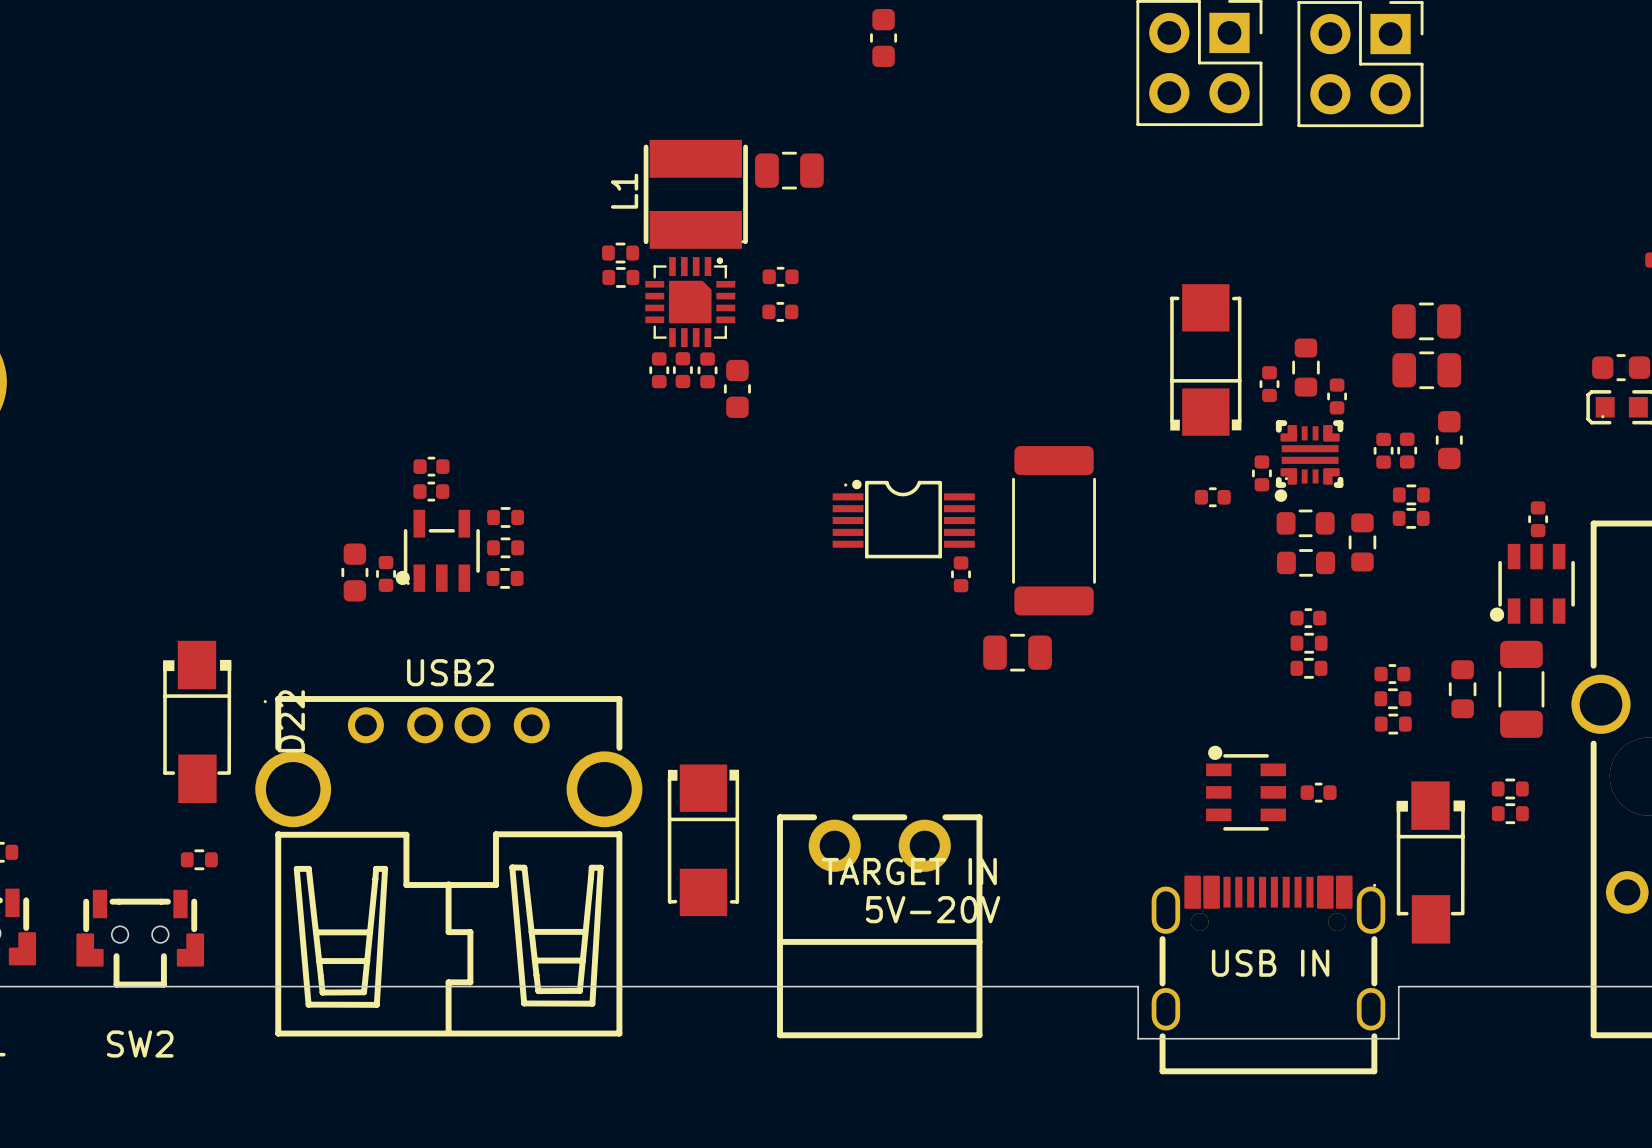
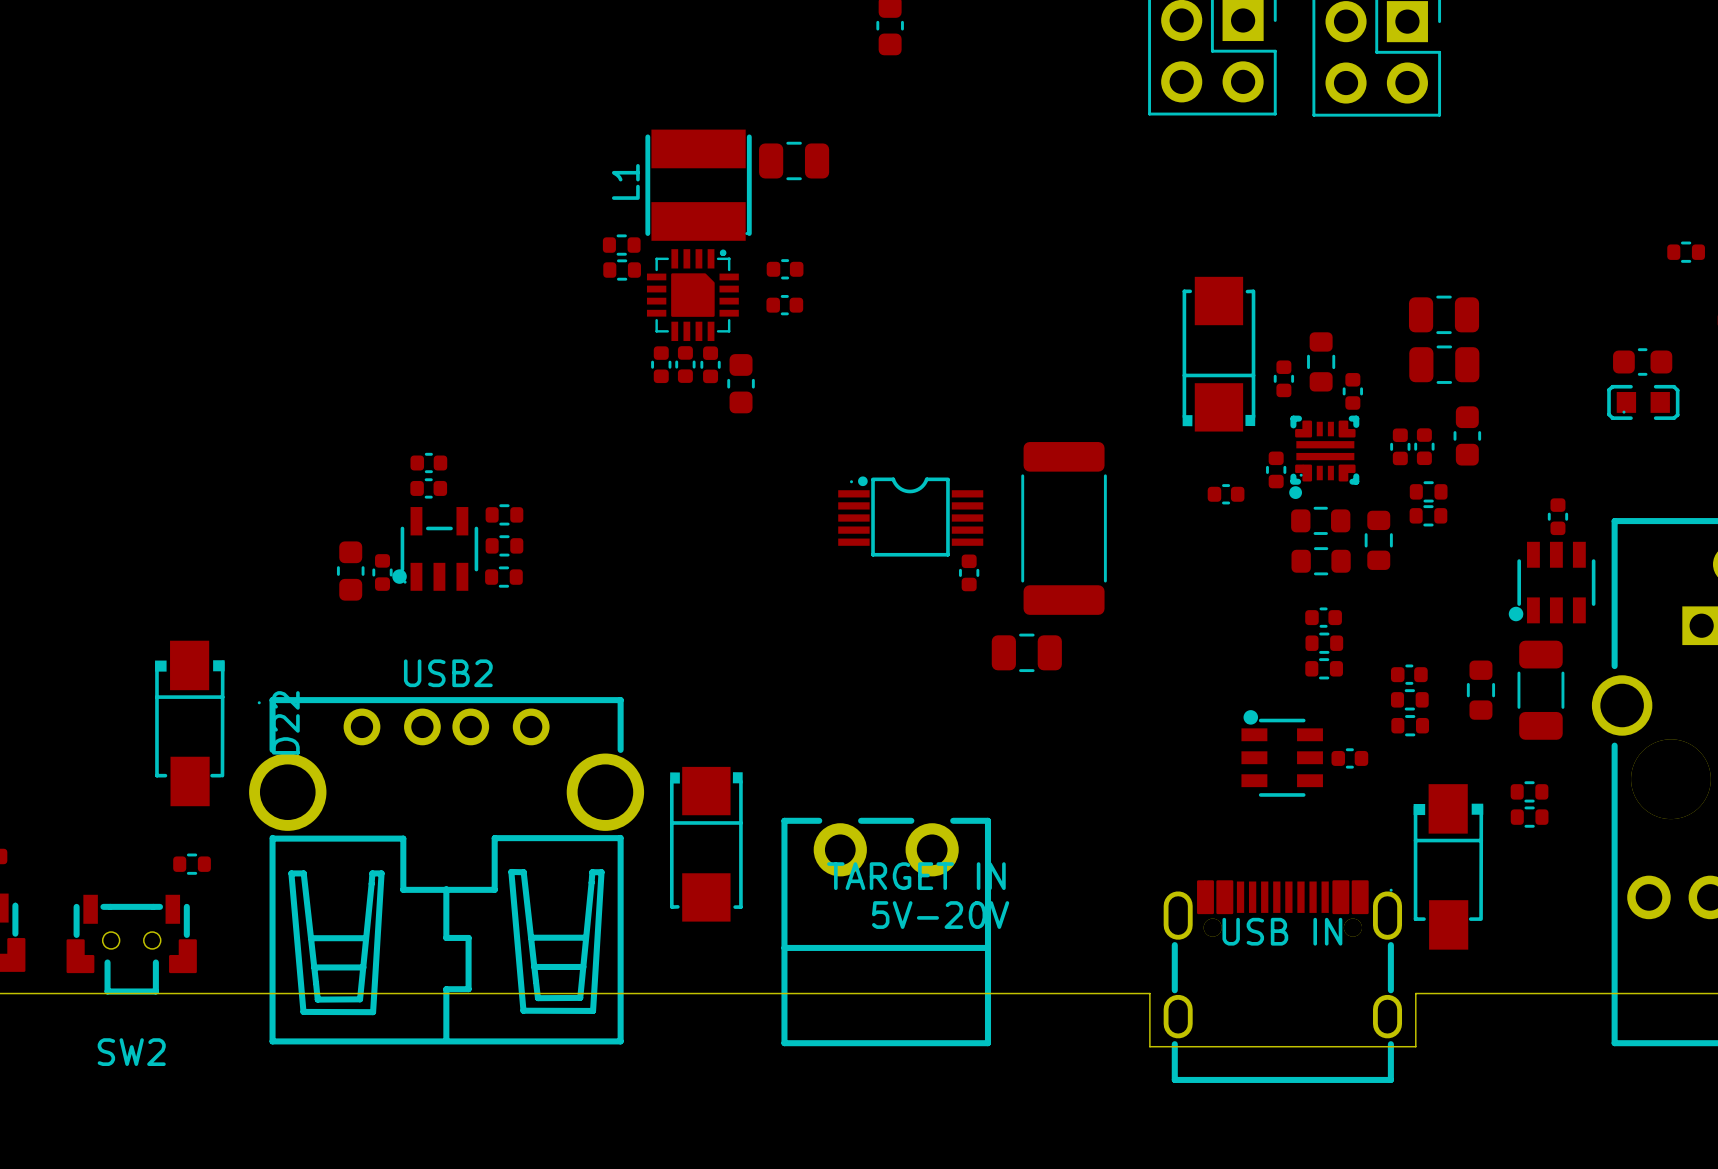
part position: (1246, 788) -> (1282, 753)
part position: (1318, 792) -> (1349, 758)
text position: USB IN (1270, 963) -> USB IN (1282, 931)

